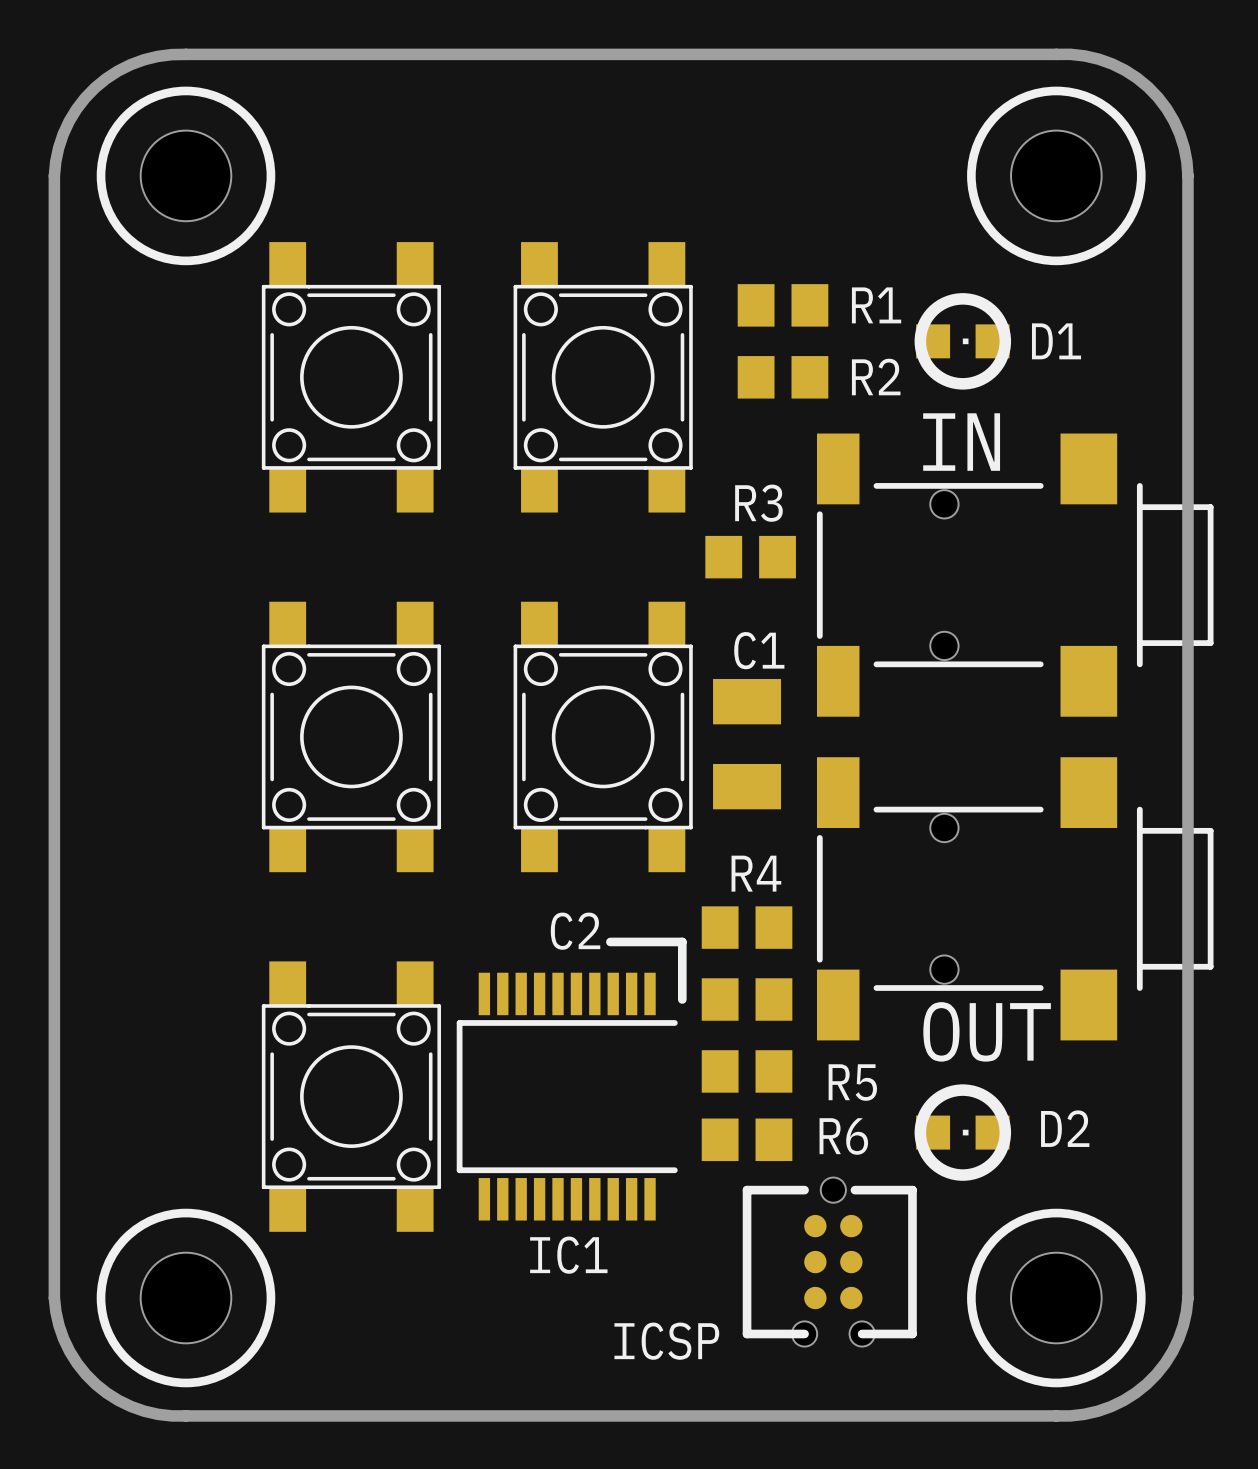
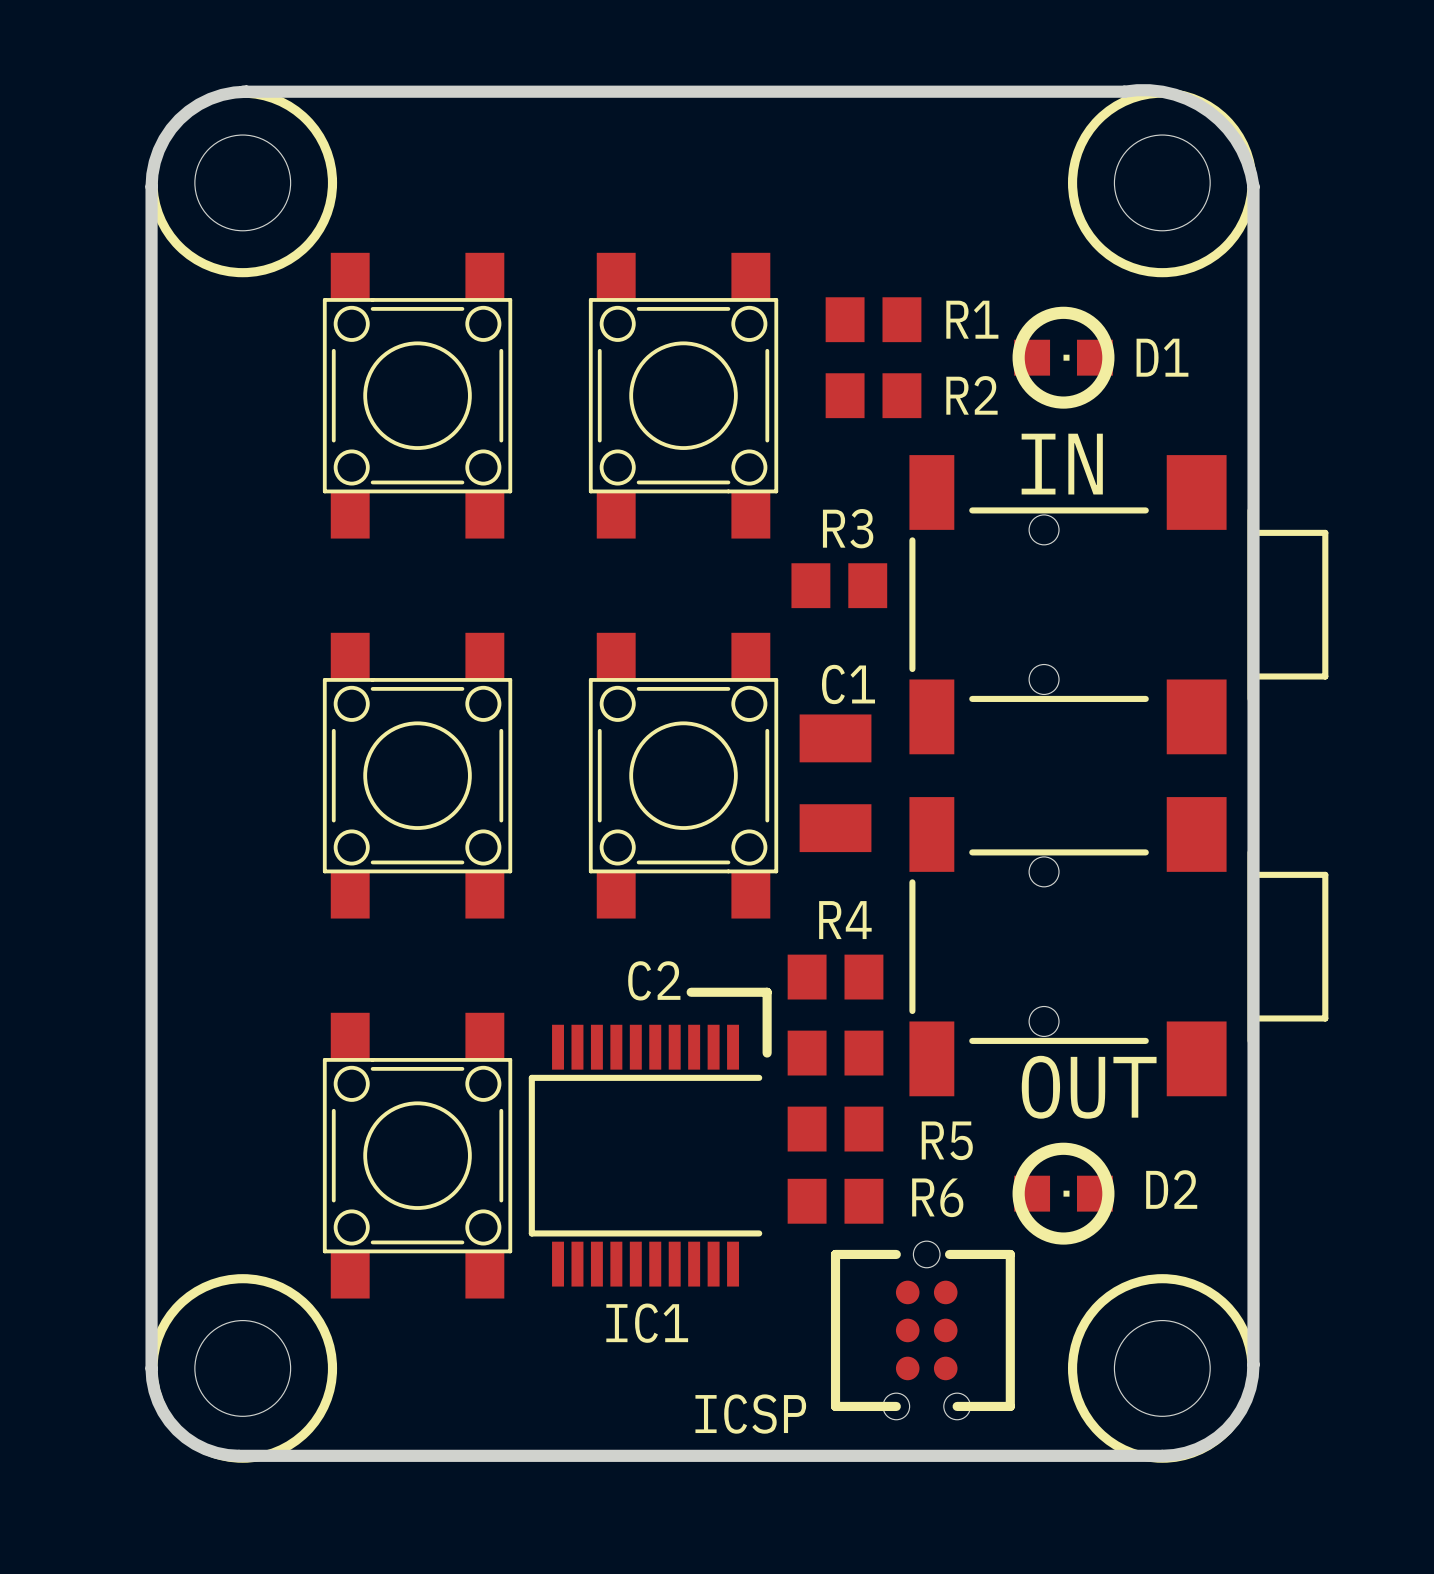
board edge: (185, 54) (1070, 54) (1098, 59) (1125, 70) (1148, 87) (1166, 108) (1173, 120) (1184, 147) (1187, 175) (1187, 1298) (1183, 1325) (1172, 1351) (1156, 1374) (1135, 1392) (1123, 1400) (1097, 1411) (1070, 1415) (171, 1415) (144, 1411) (118, 1400) (95, 1384) (77, 1363) (63, 1338) (55, 1311) (54, 1298) (54, 175) (58, 147) (63, 134) (76, 109) (95, 87) (105, 78) (130, 64) (157, 56) (185, 54) -> none
board edge: none -> (242, 91) (1149, 90) (1174, 94) (1198, 104) (1219, 119) (1235, 139) (1247, 161) (1253, 186) (1253, 1364) (1252, 1376) (1246, 1399) (1234, 1420) (1217, 1437) (1197, 1448) (1174, 1455) (1162, 1455) (238, 1455) (205, 1449) (185, 1437) (169, 1421) (158, 1401) (151, 1368) (151, 186) (154, 162) (158, 150) (164, 139) (179, 119) (199, 104) (210, 98) (221, 94) (246, 91)

